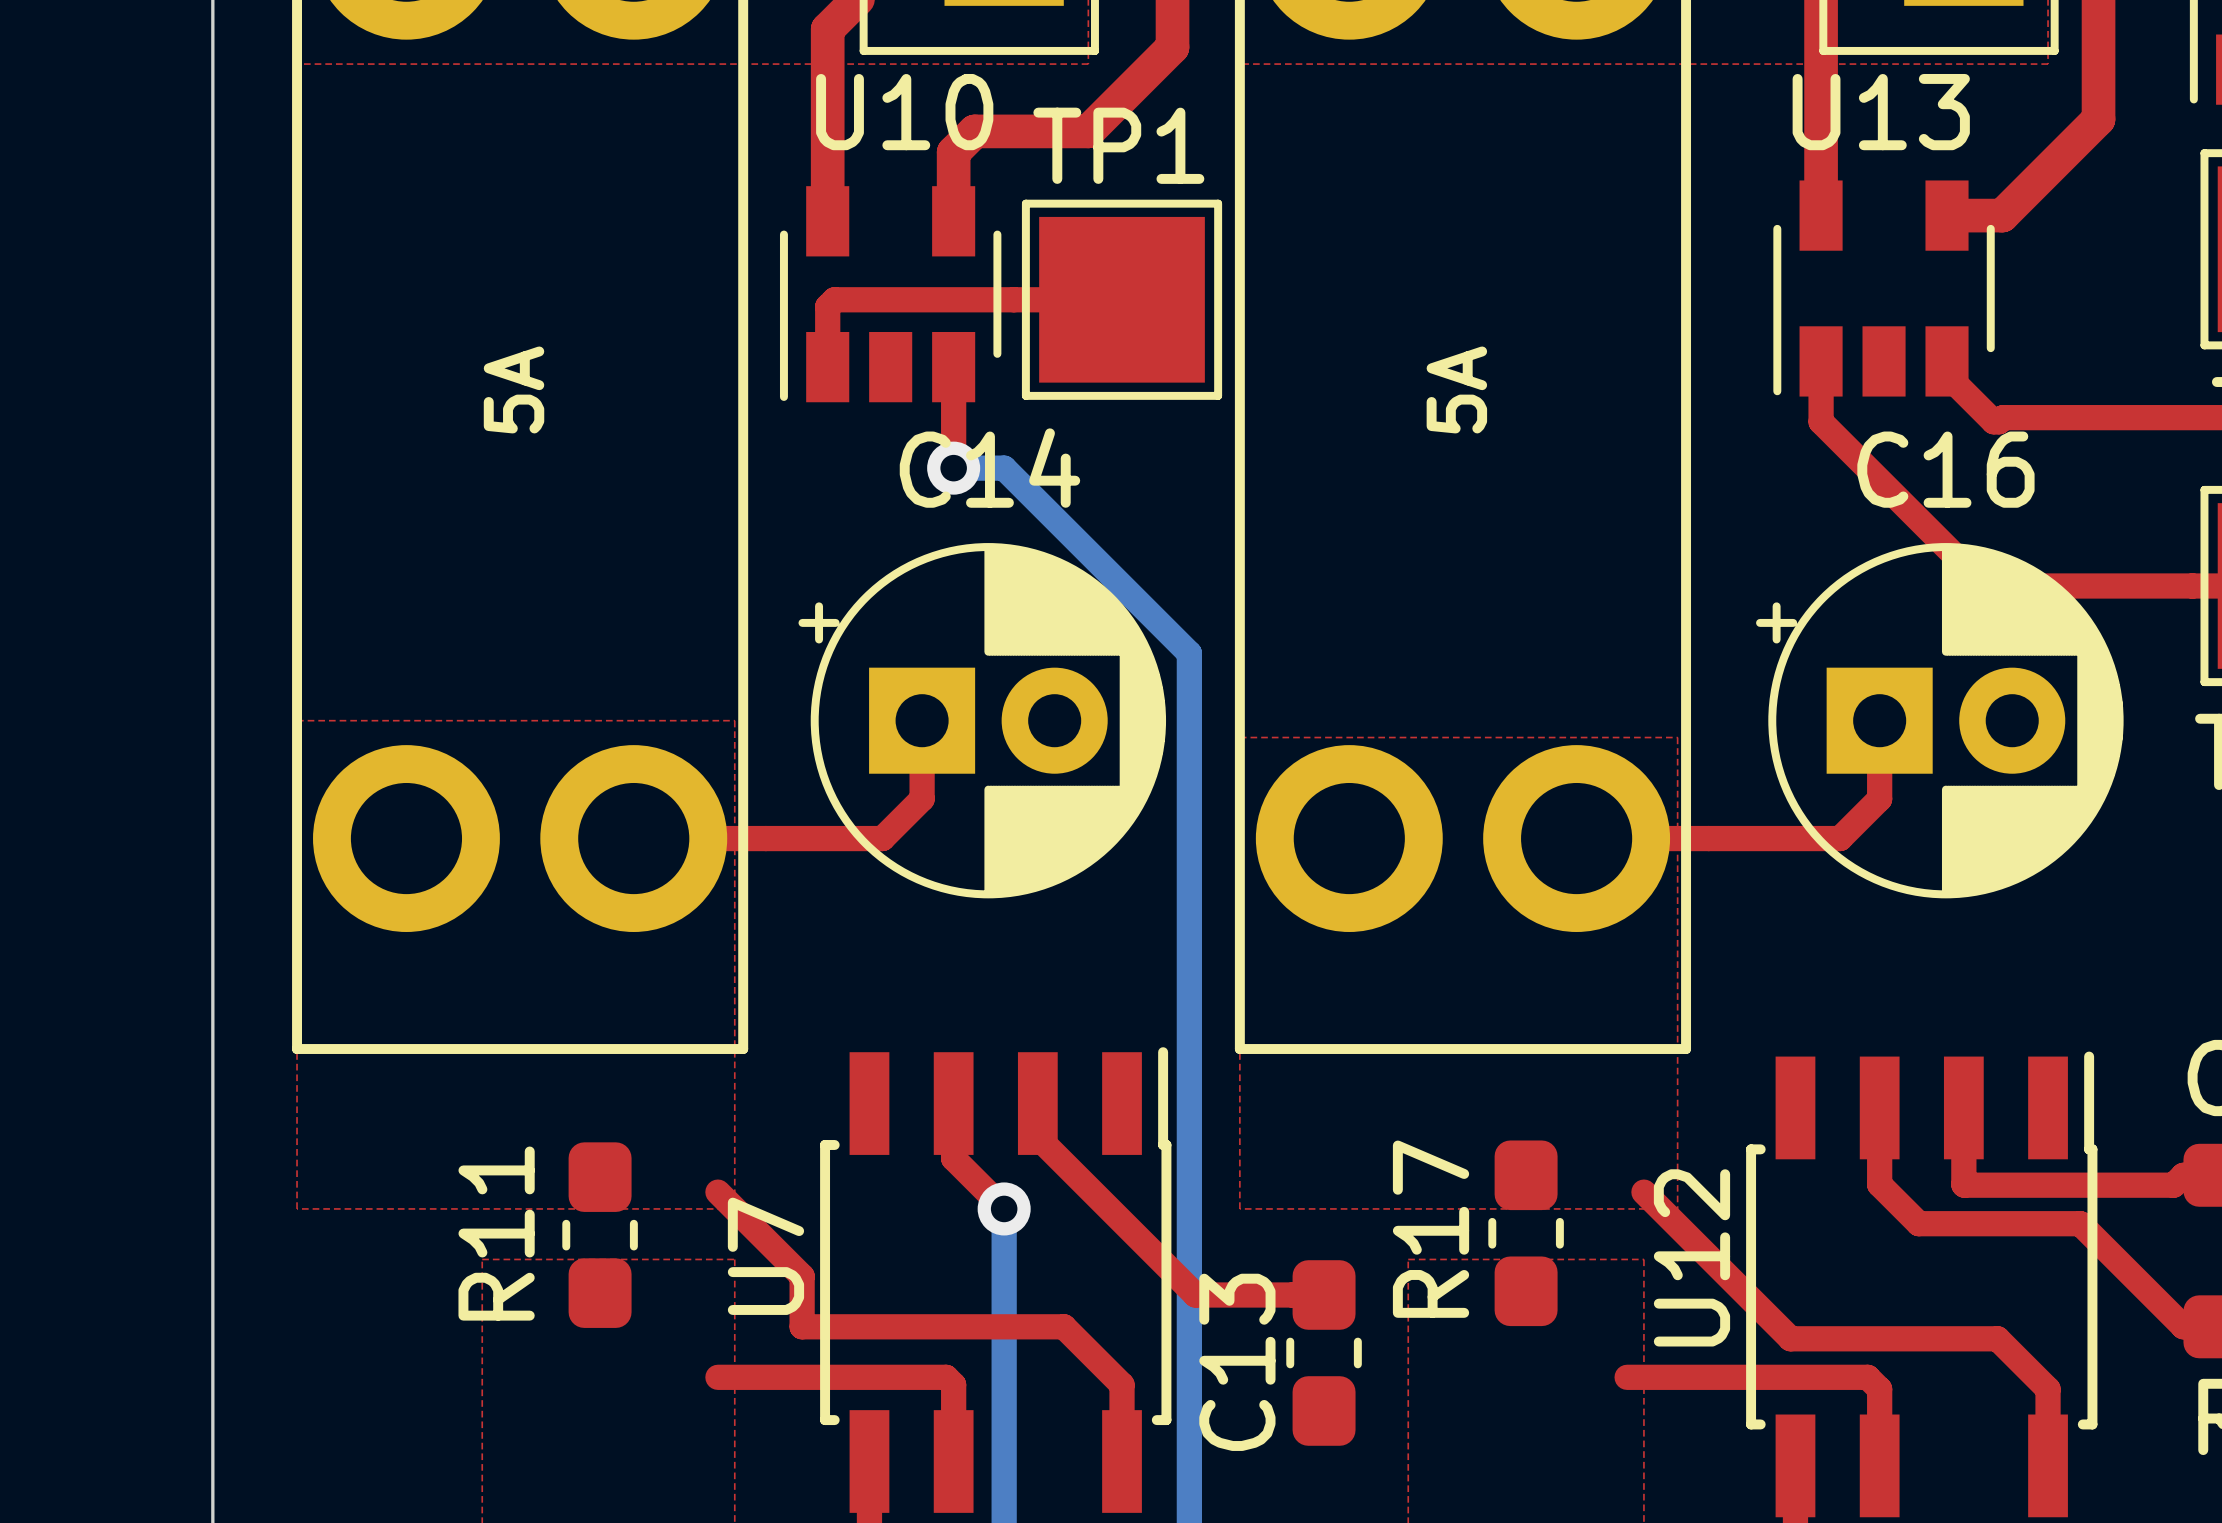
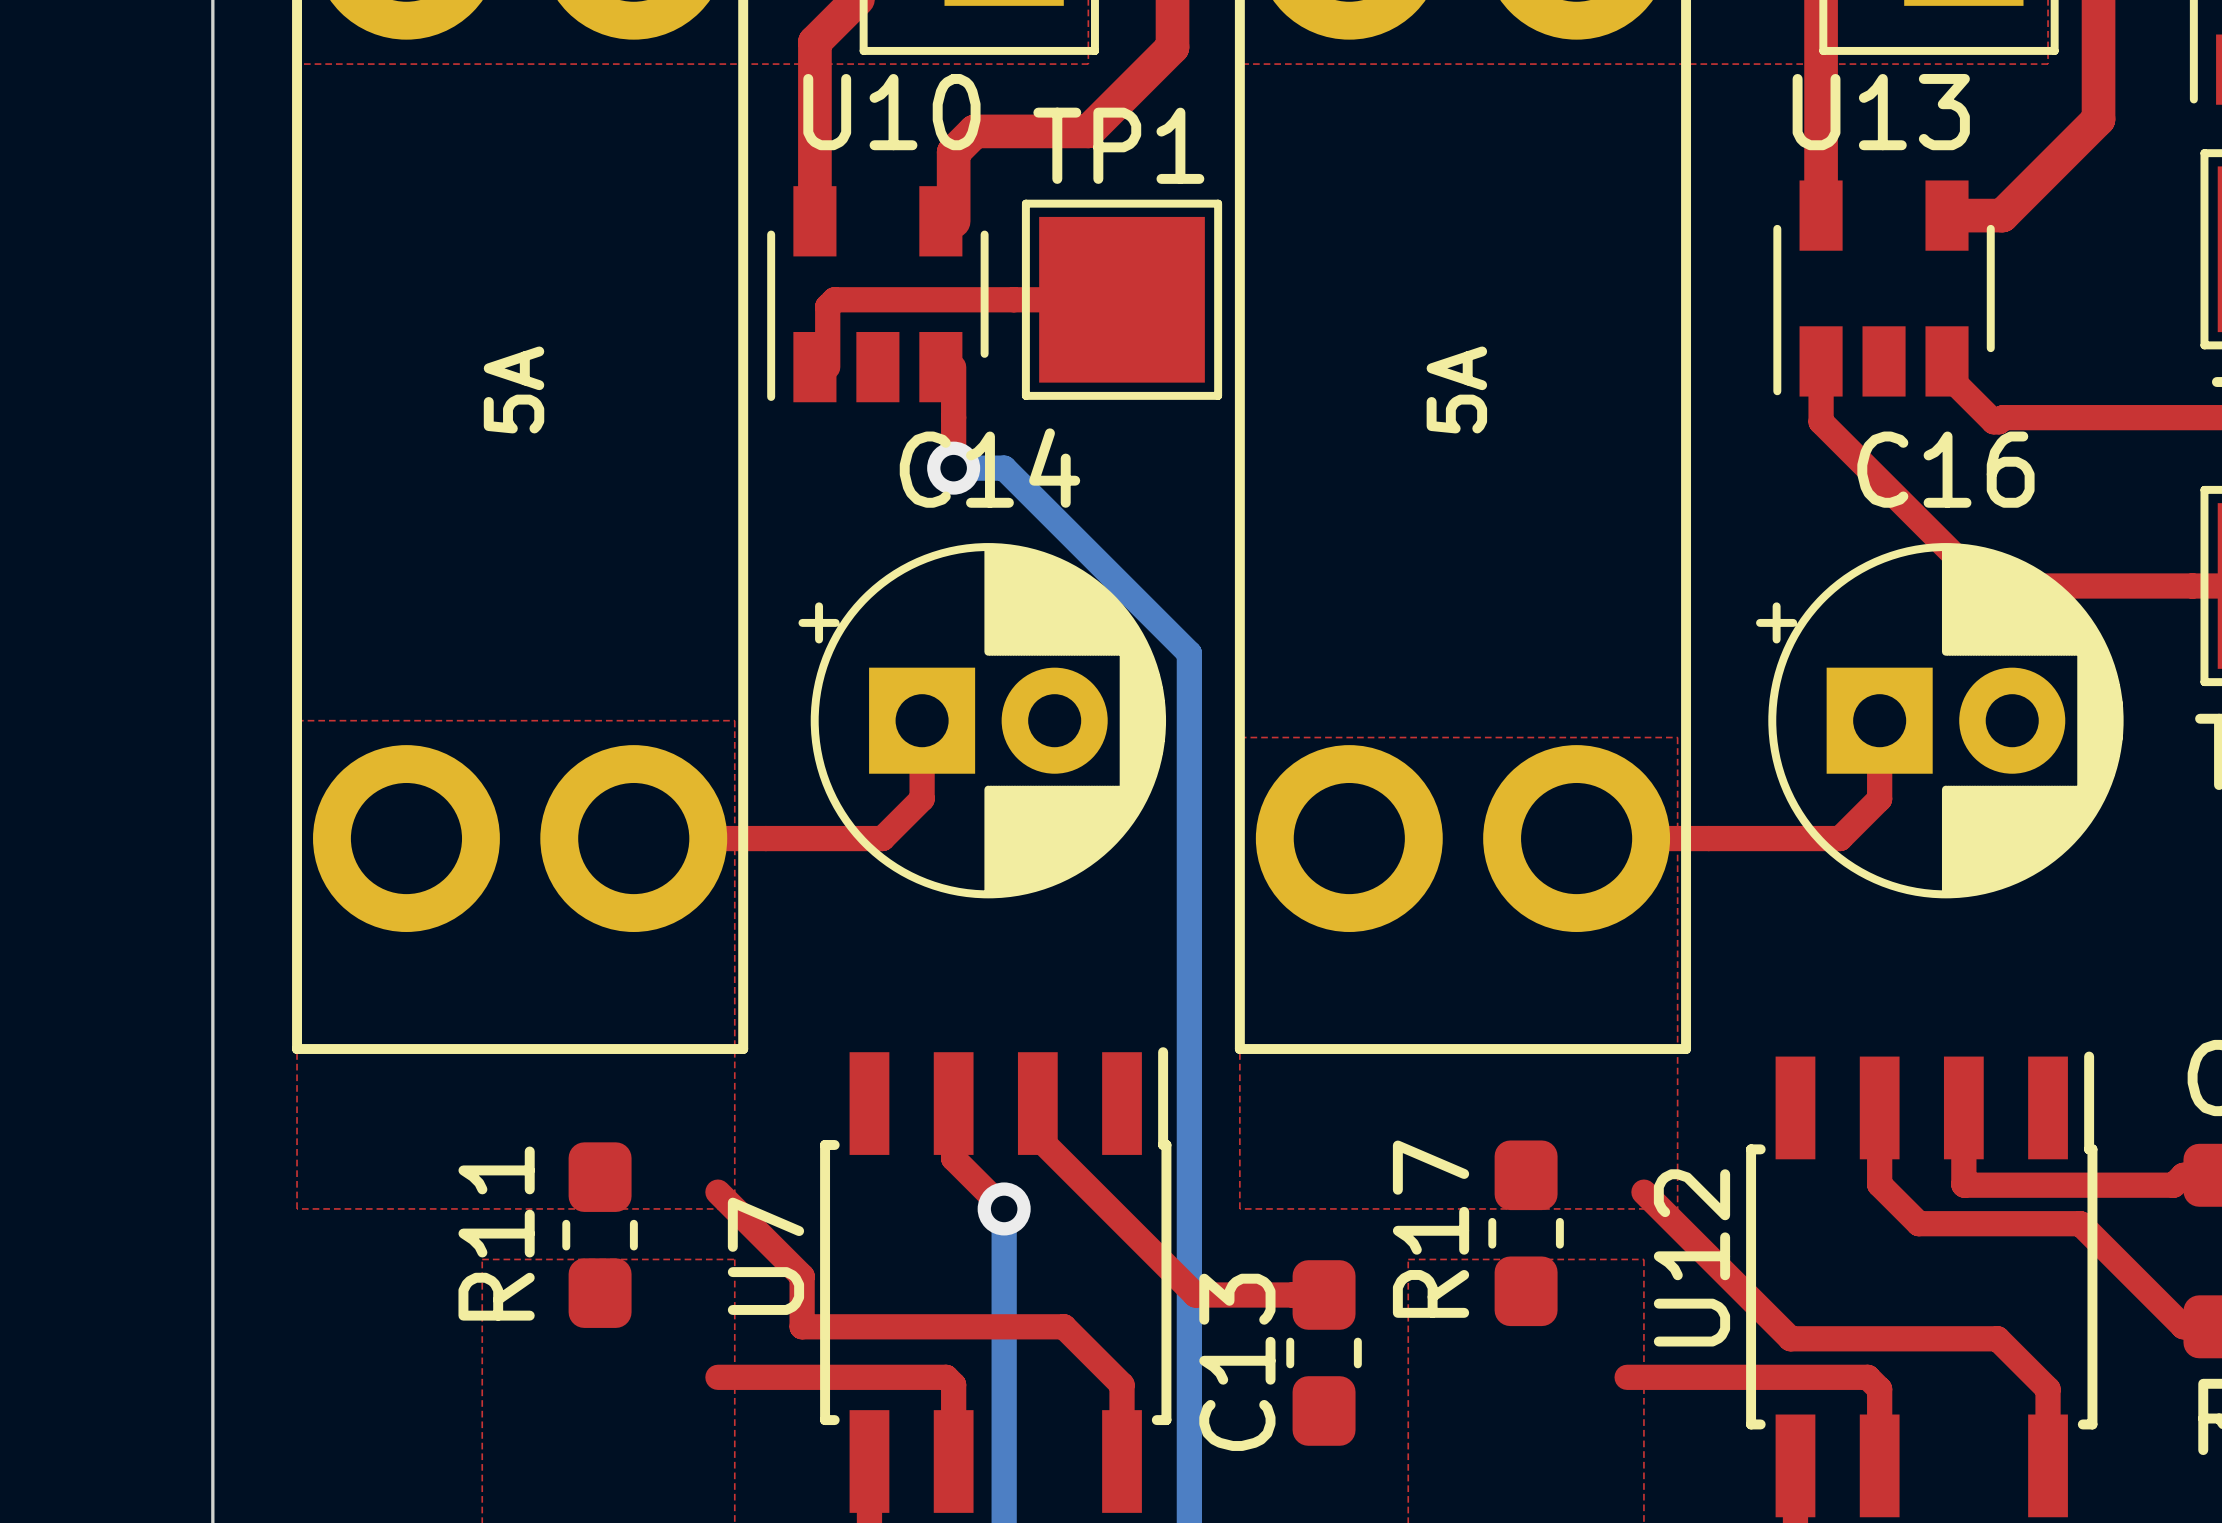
top track: (827, 29) (827, 221) -> (827, 29) (814, 42) (814, 221)
U10 position: (890, 294) -> (877, 294)

